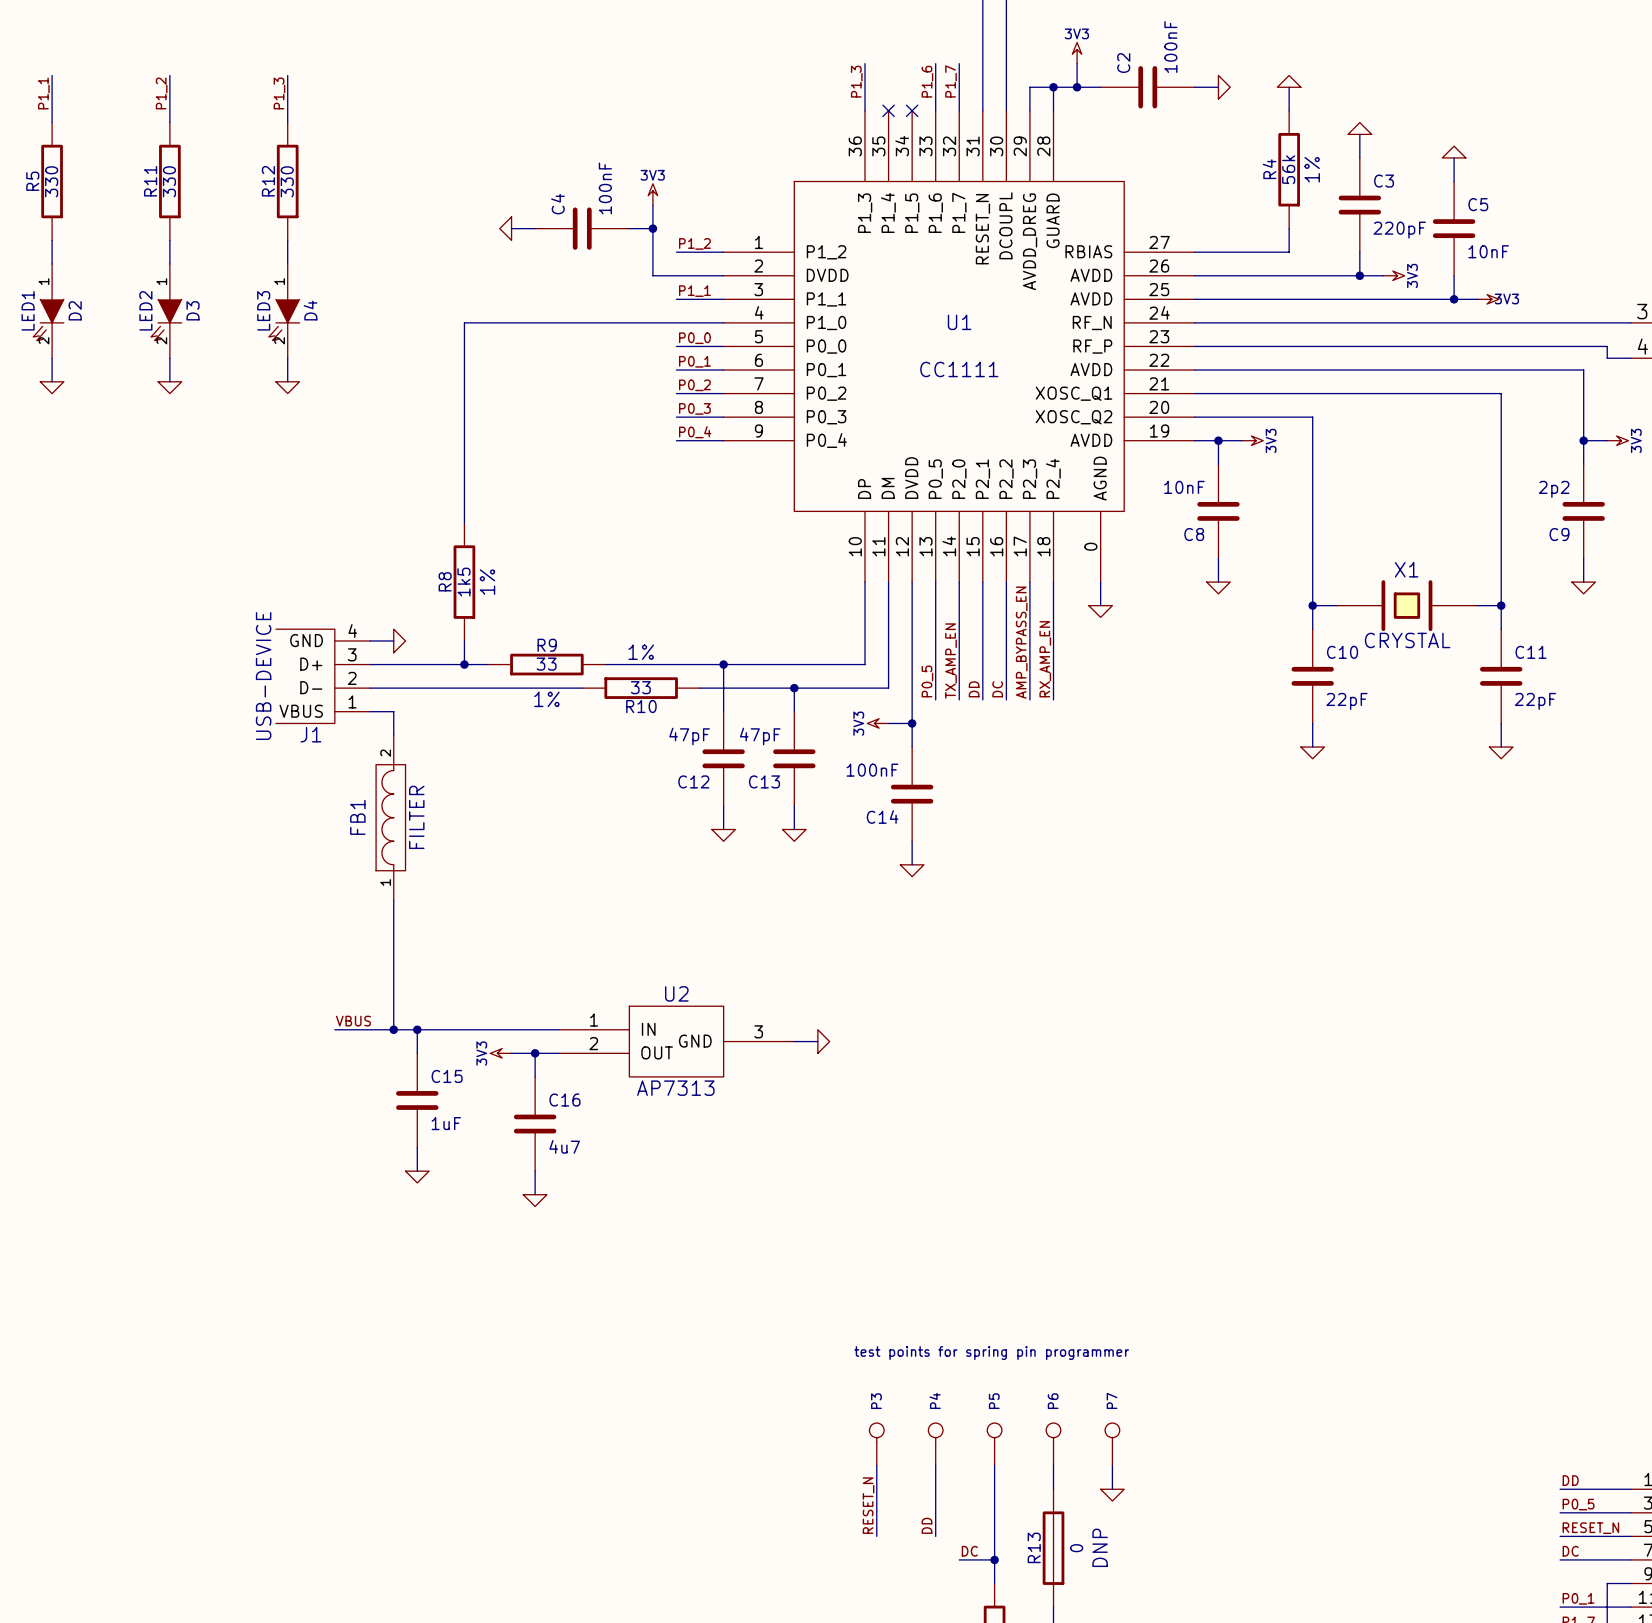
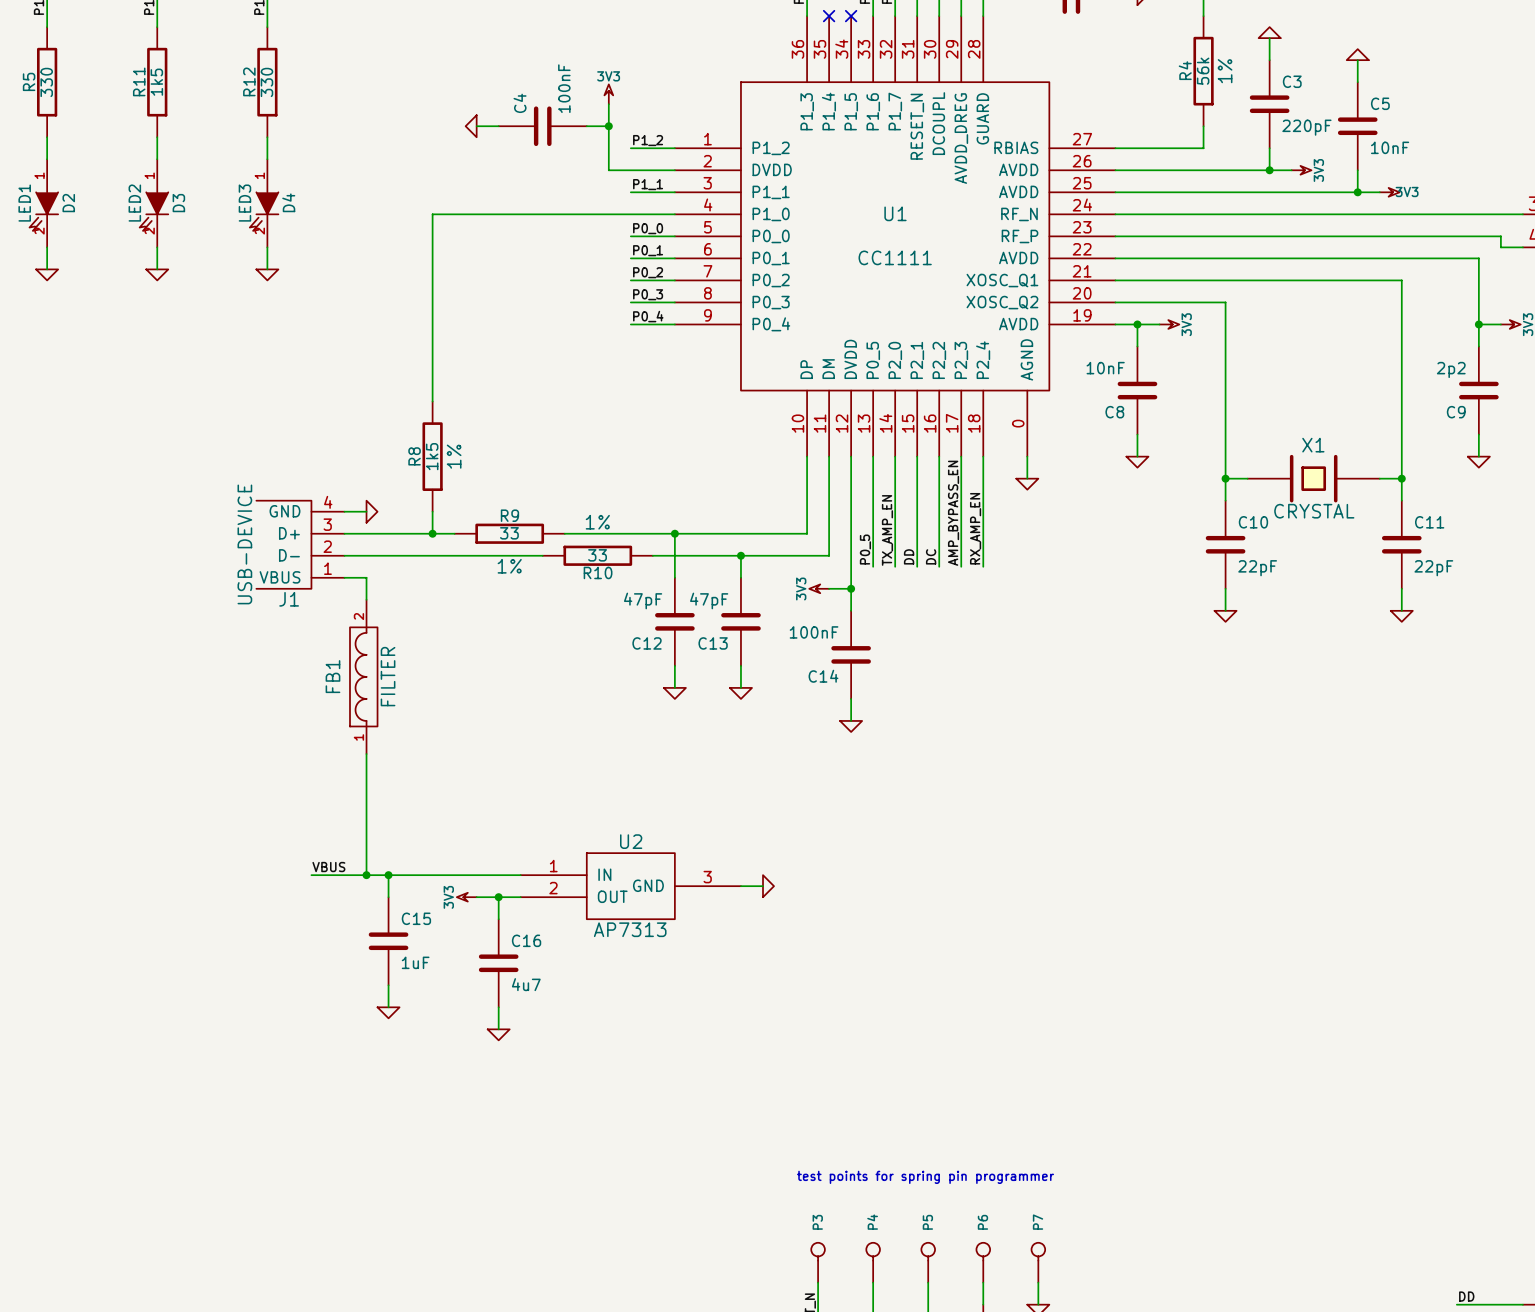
R11 value: 330 (169, 181) -> 1k5 (156, 82)

